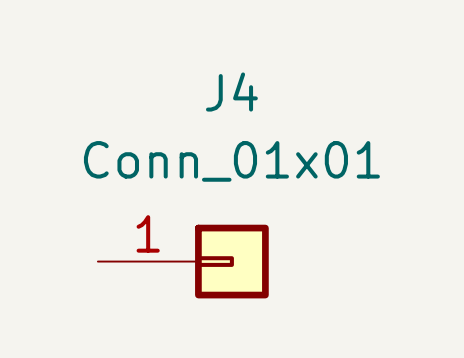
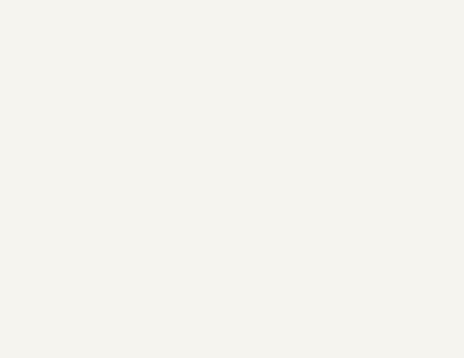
J4: Conn_01x01 (183, 261) -> none

